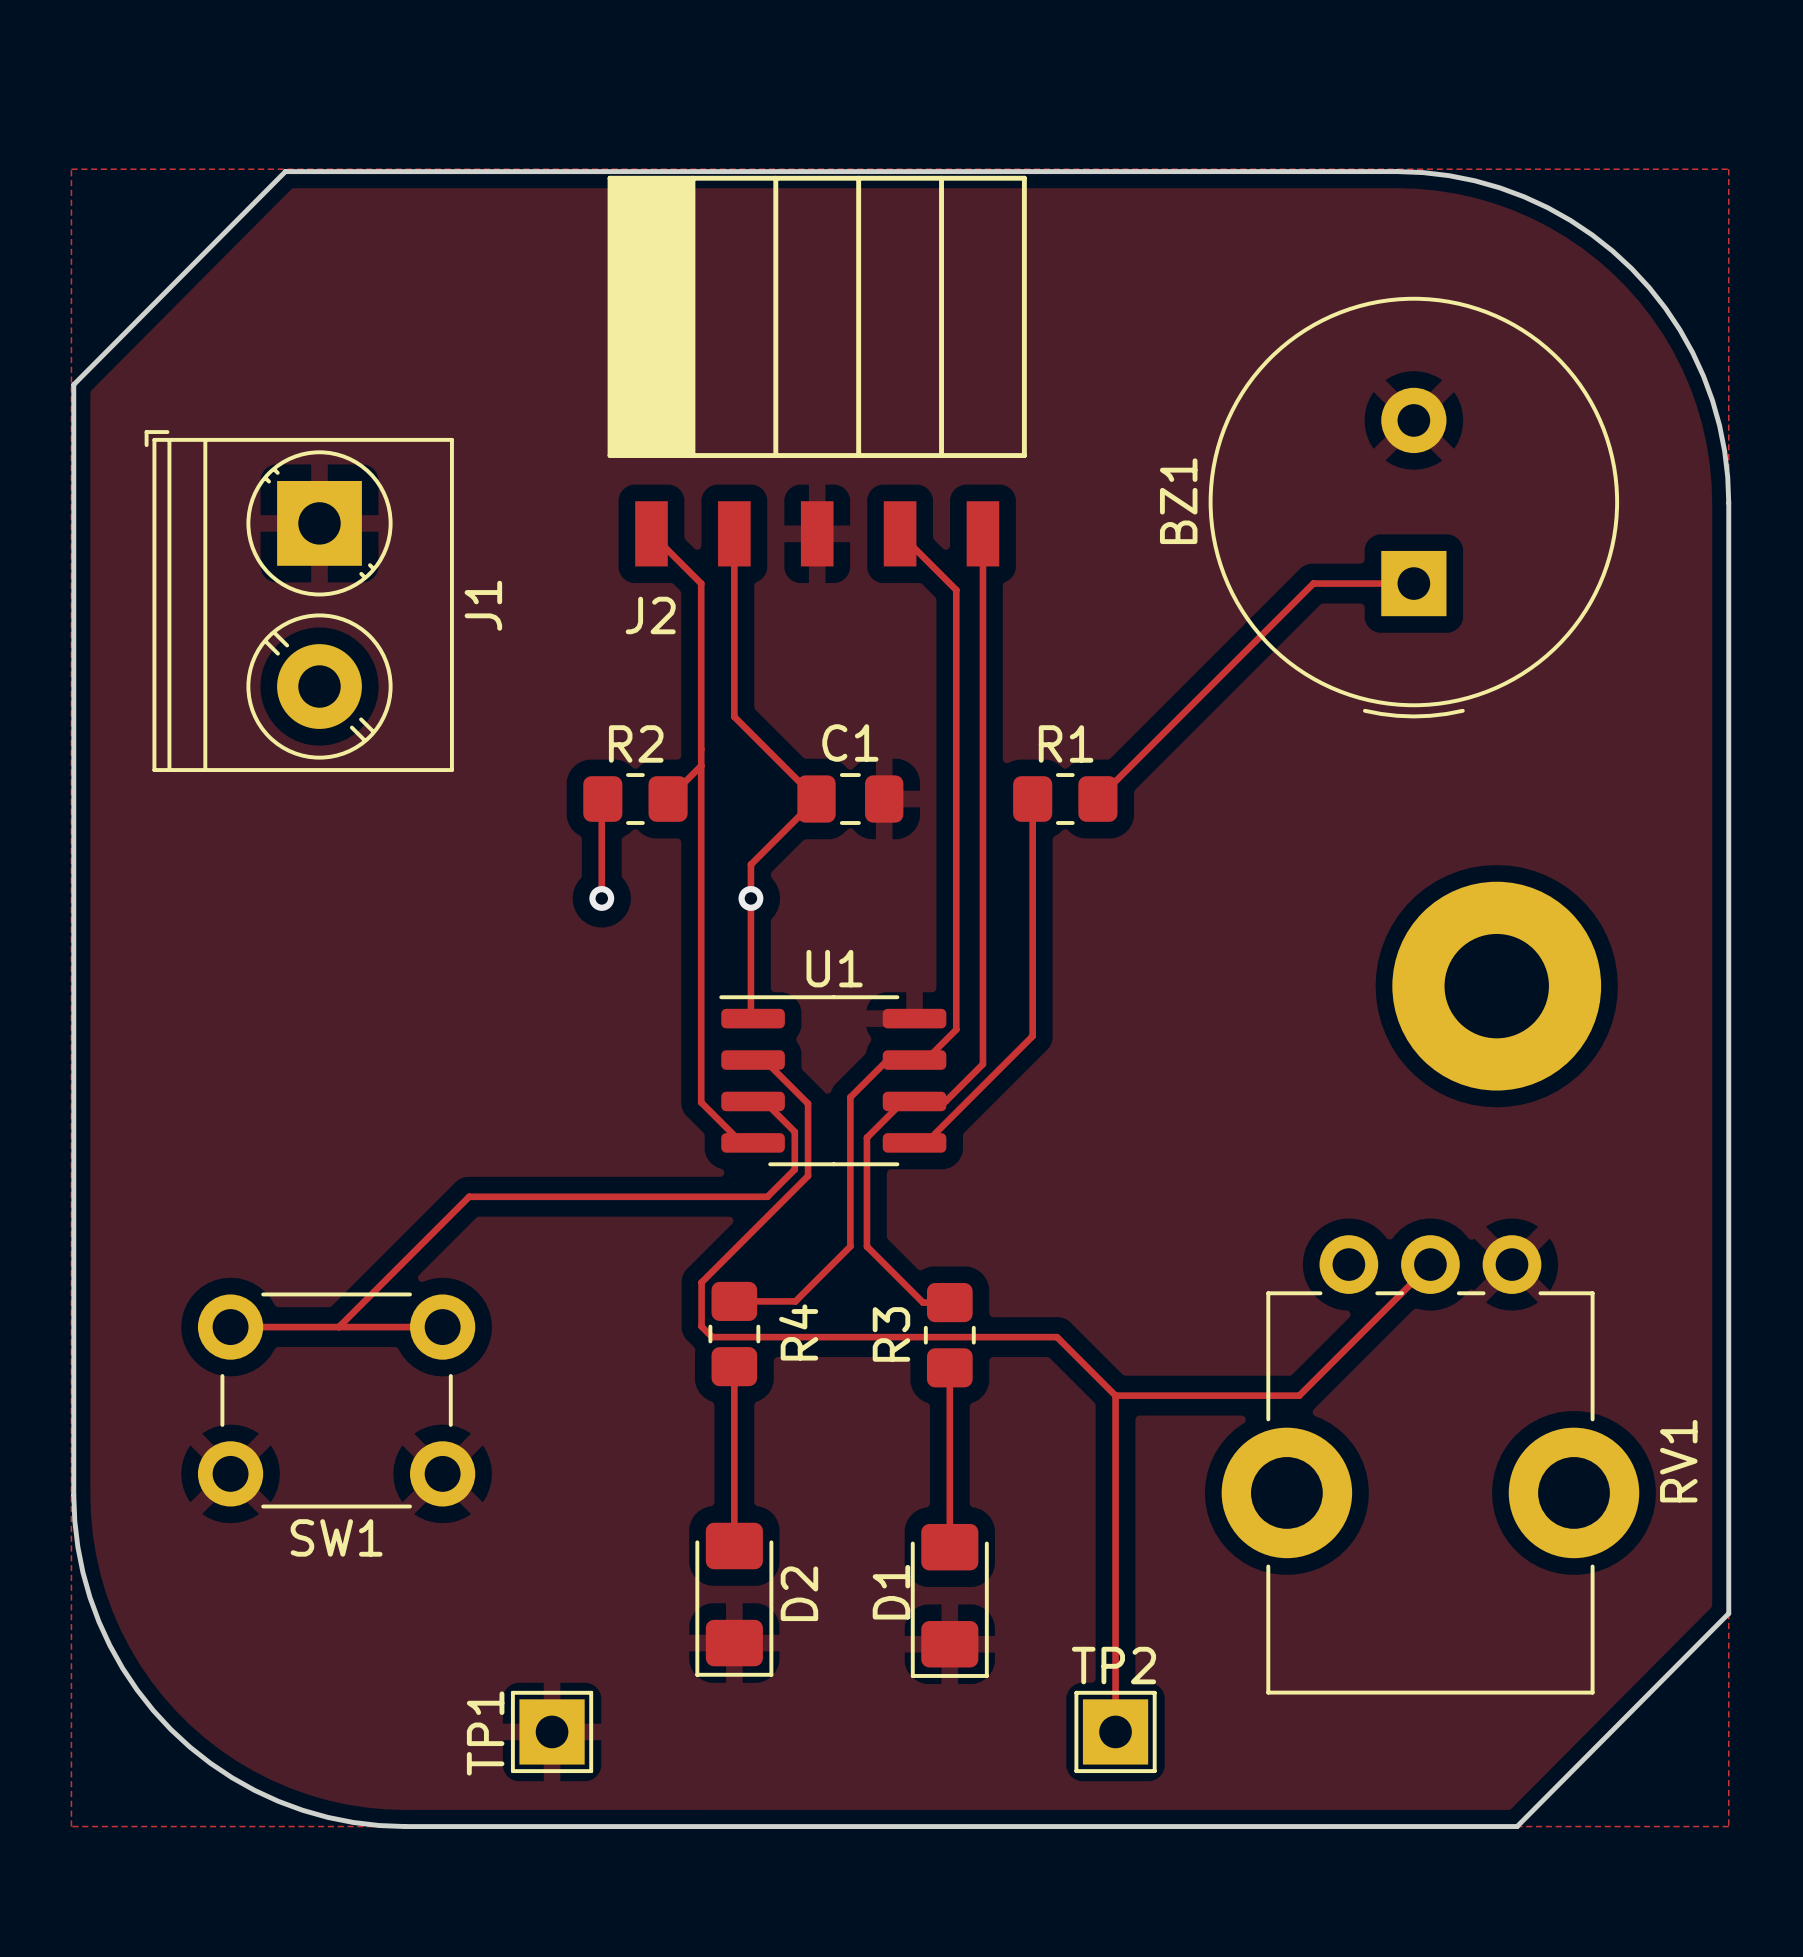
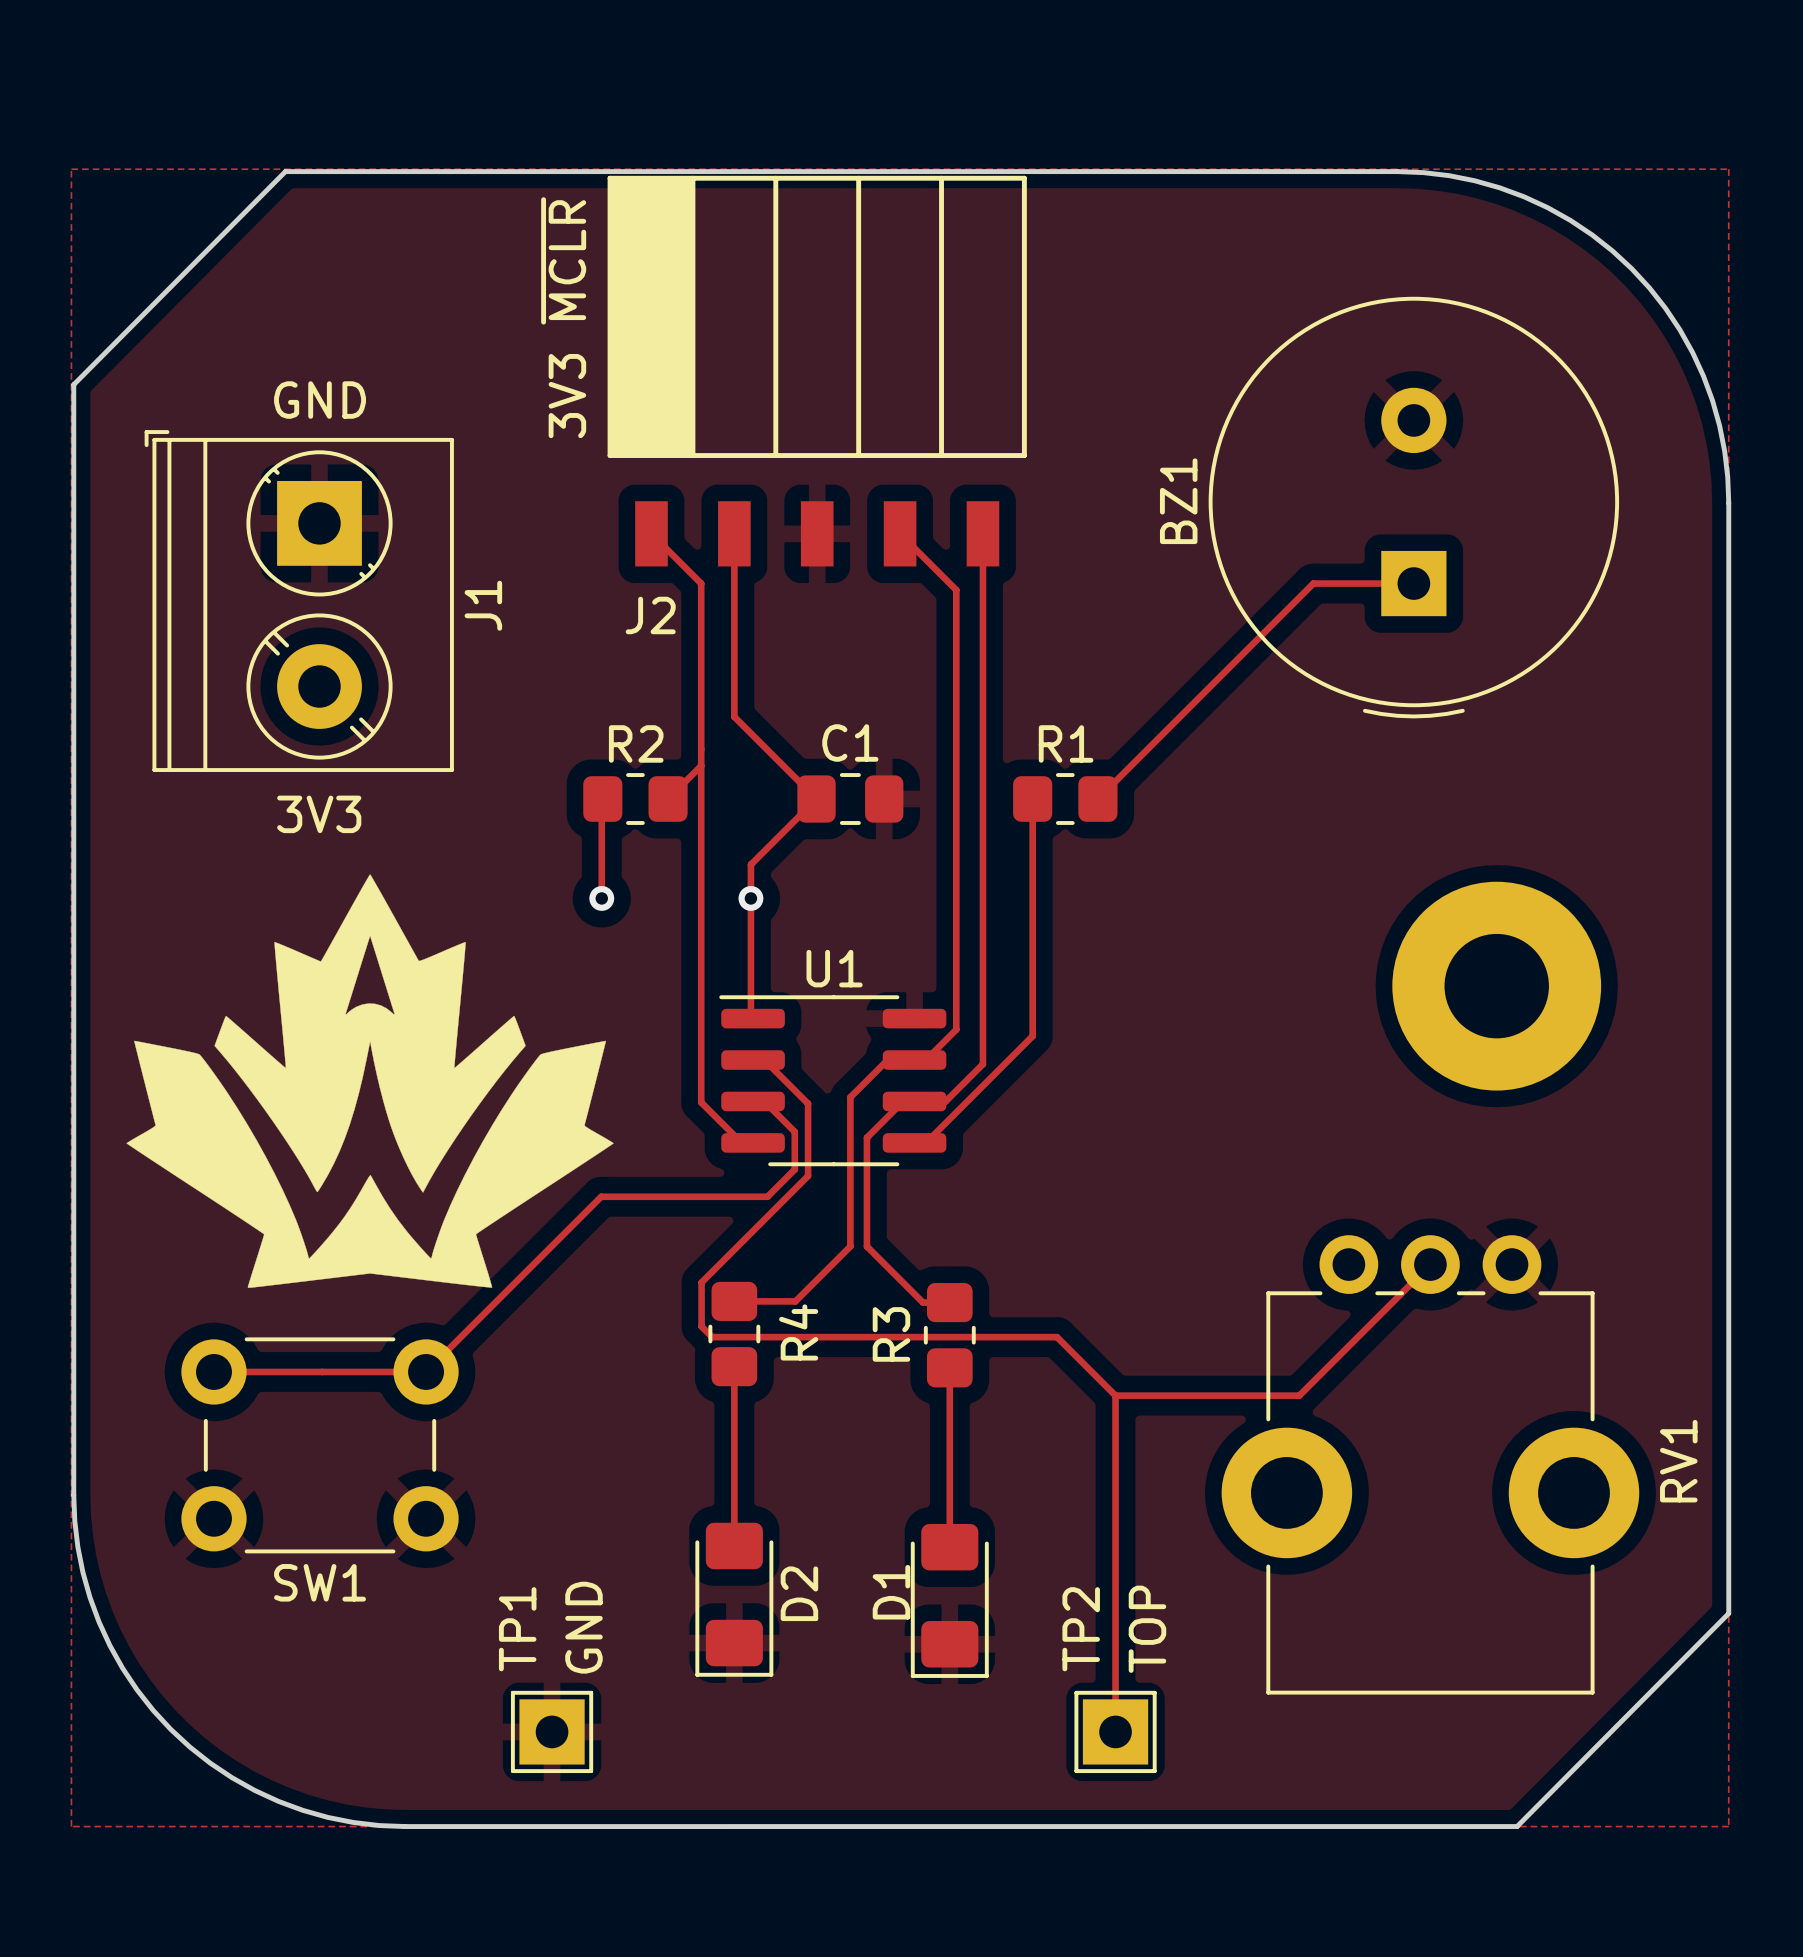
text: none -> 3V3 ~{MCLR} (563, 317)
text: none -> GND (320, 400)
text: none -> 3V3 (319, 814)
drawing: none -> [126, 874, 614, 1288]
track: (601, 1196) (469, 1196) (338, 1327) -> (601, 1196) (426, 1371) (213, 1371)
track: (230, 1327) (442, 1327) -> none
SW1 position: (336, 1400) -> (320, 1445)
text: none -> GND (583, 1627)
text: none -> TOP (1147, 1629)
TP2 name rotation: 0° (1113, 1665) -> 90° counterclockwise (1081, 1629)
TP1 name position: TP1 (485, 1733) -> TP1 (517, 1629)

